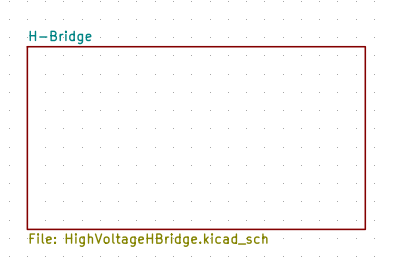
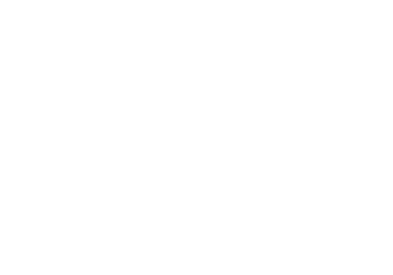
sheet H-Bridge: File: HighVoltageHBridge.kicad_sch (196, 138) -> none

